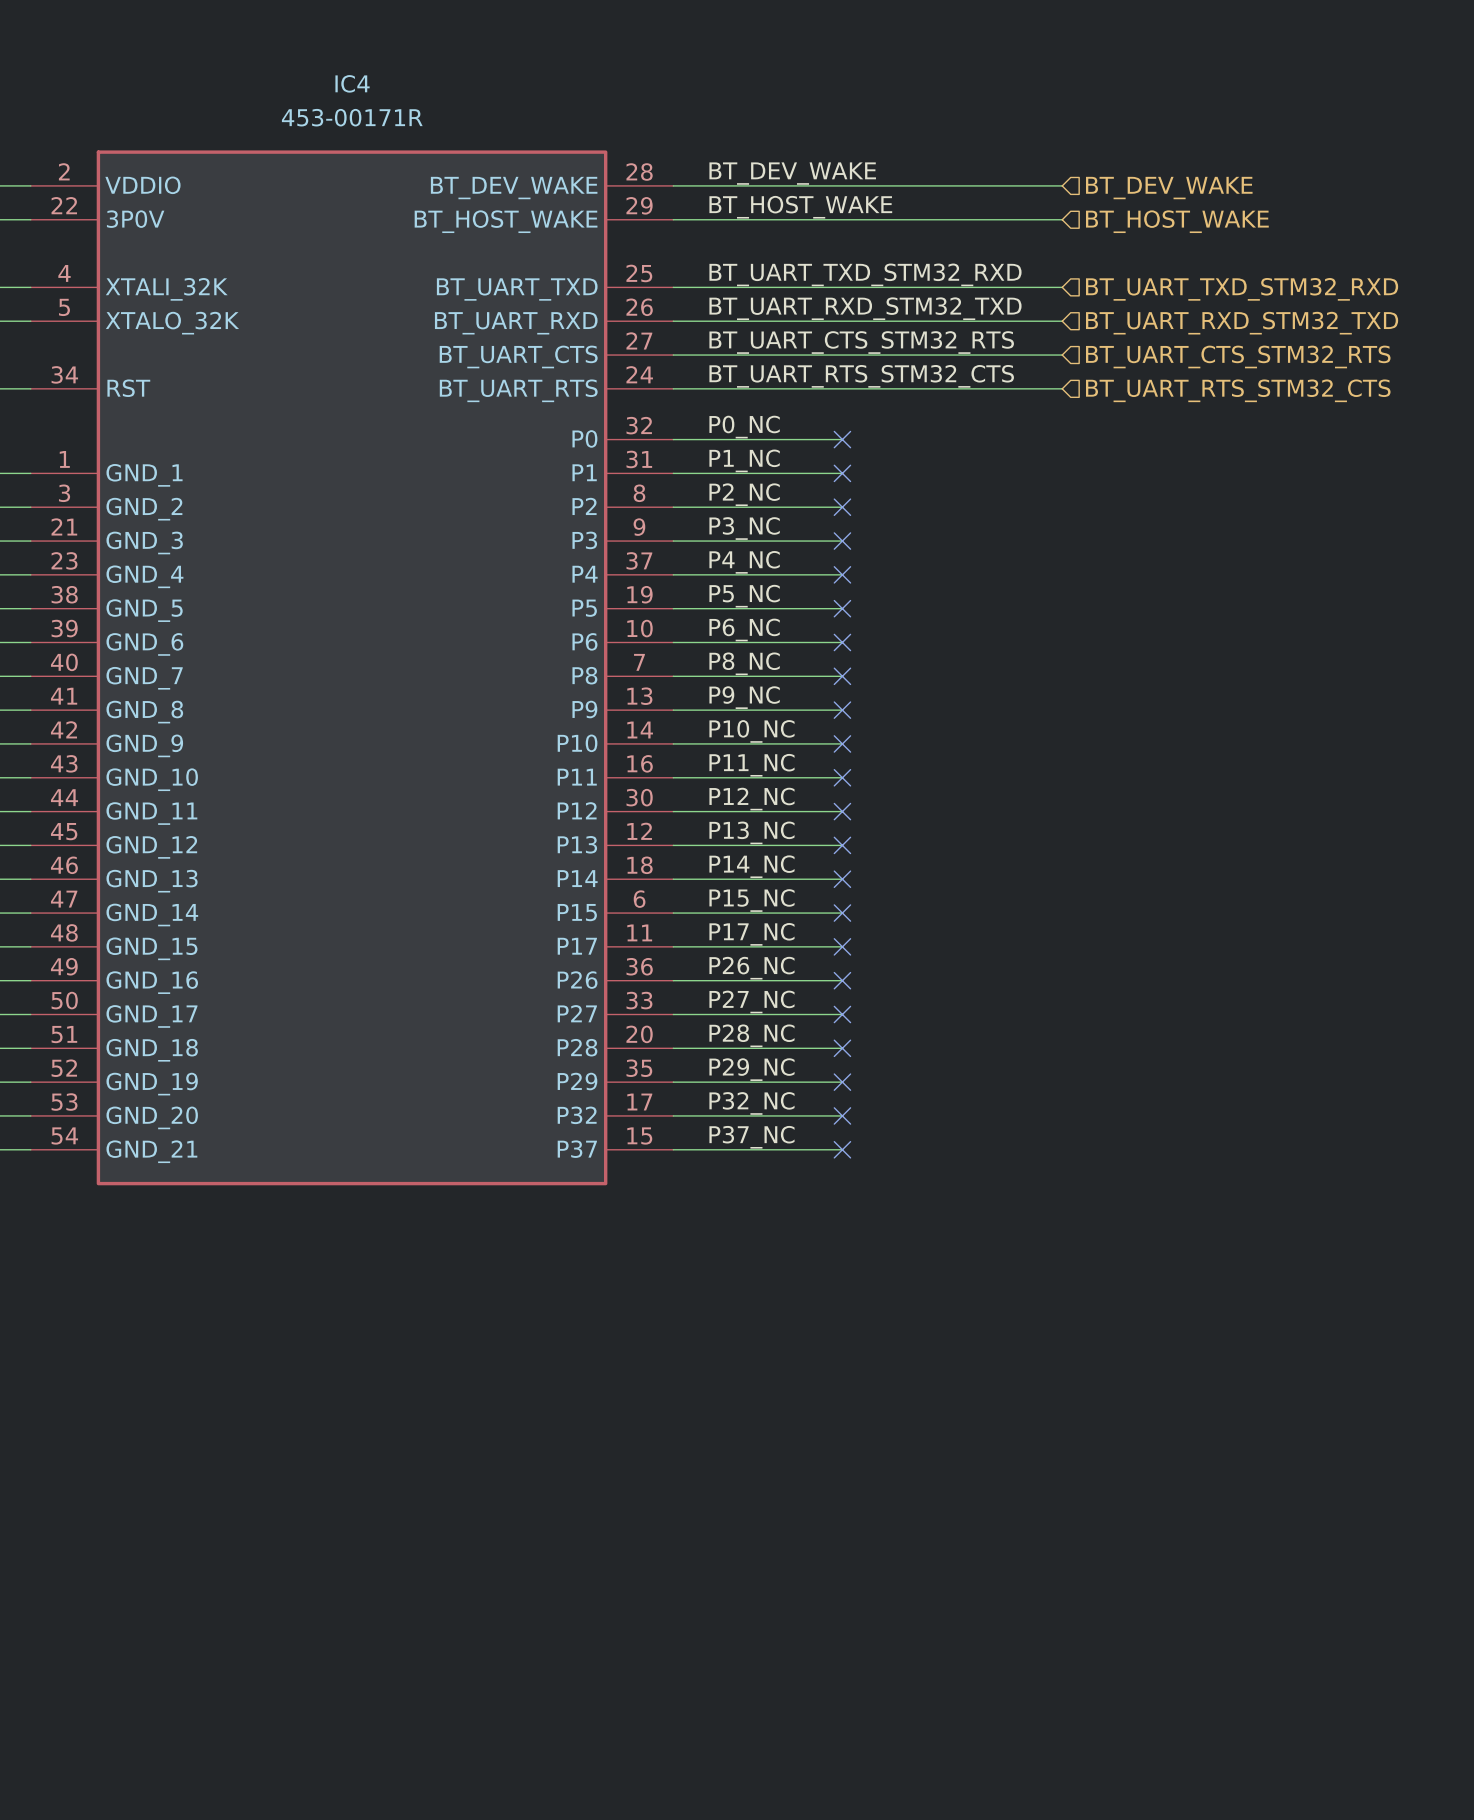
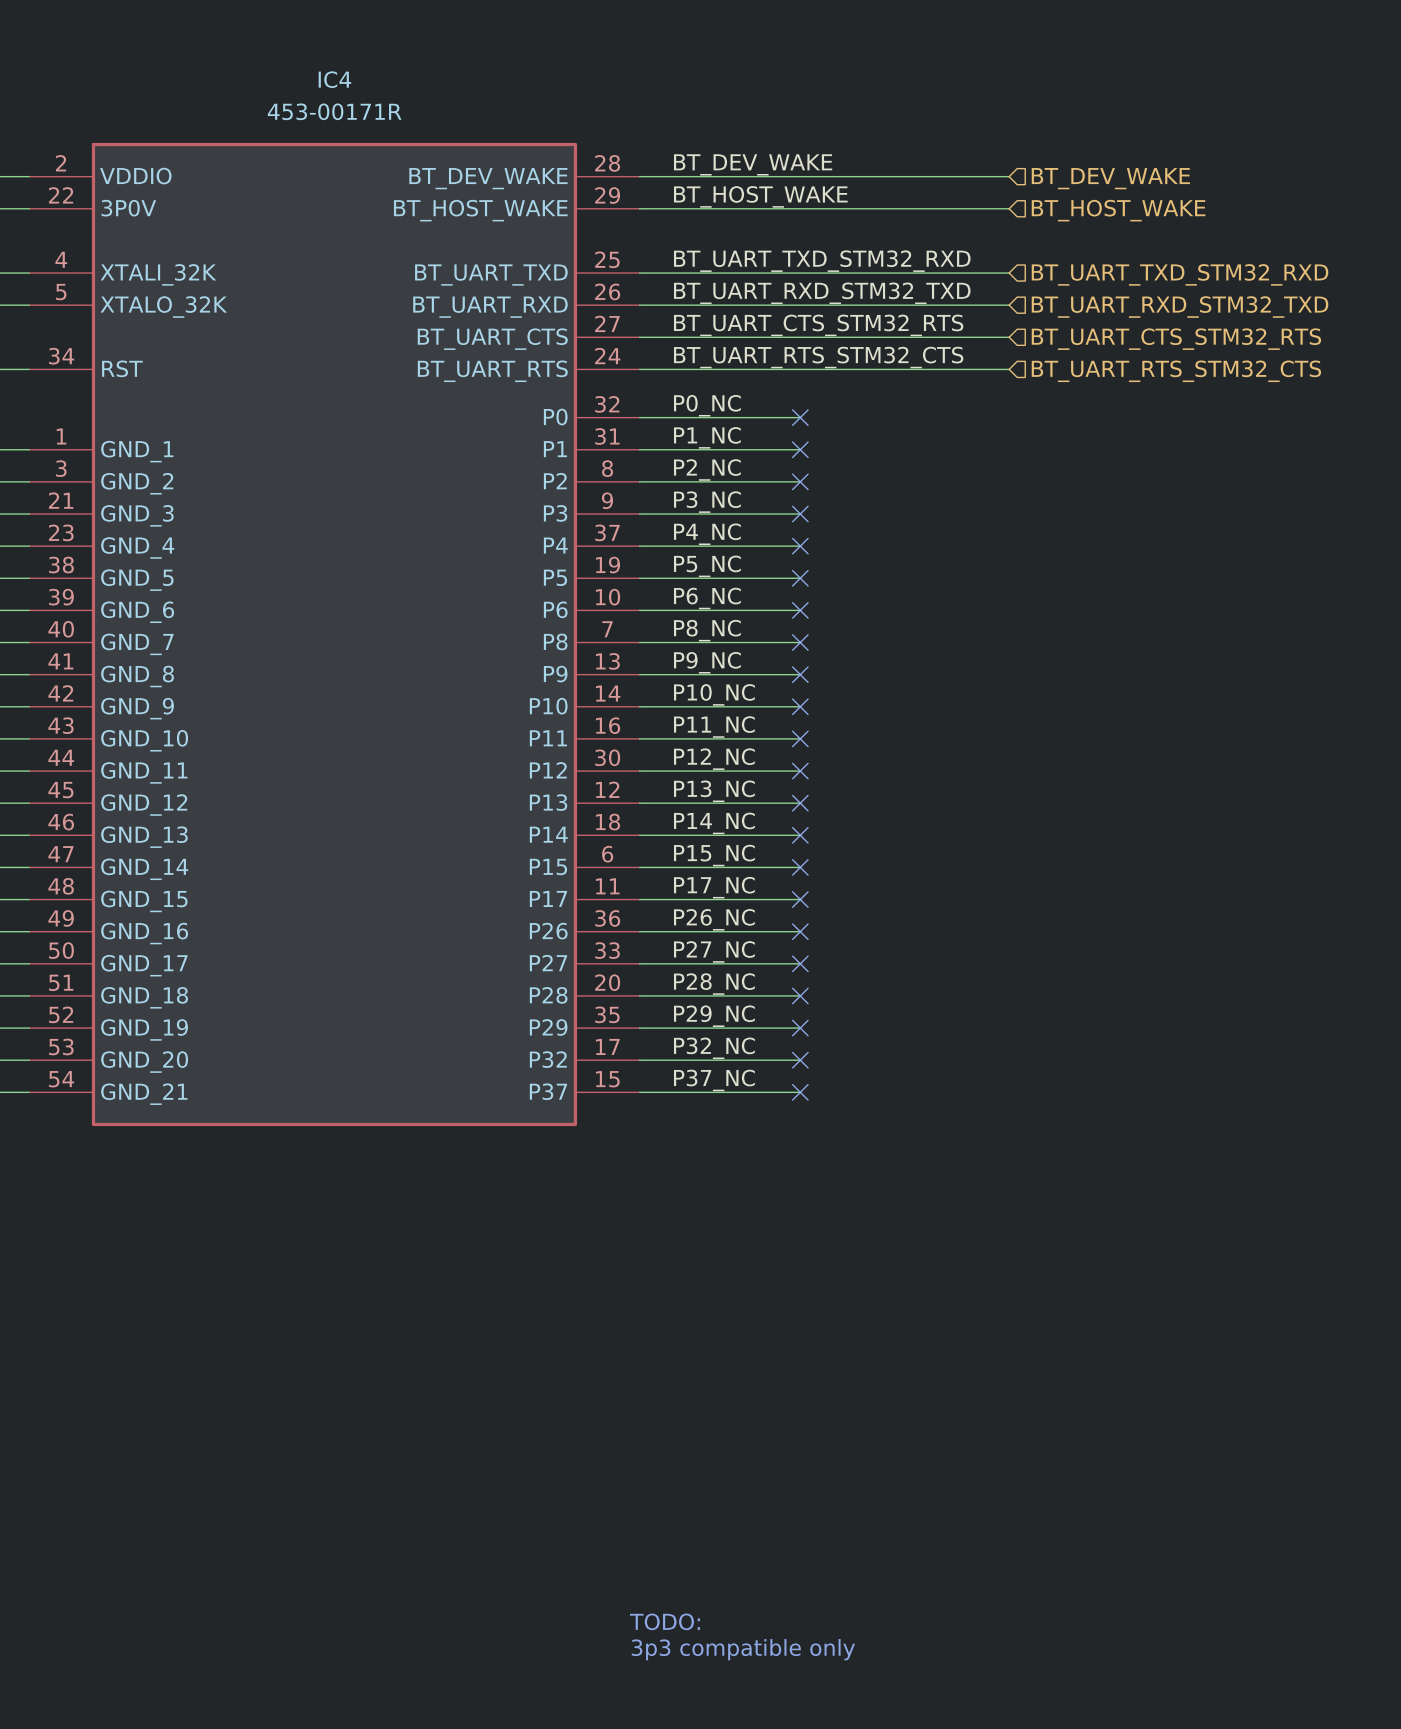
text: none -> TODO: (665, 1621)
text: none -> 3p3 compatible only (743, 1649)

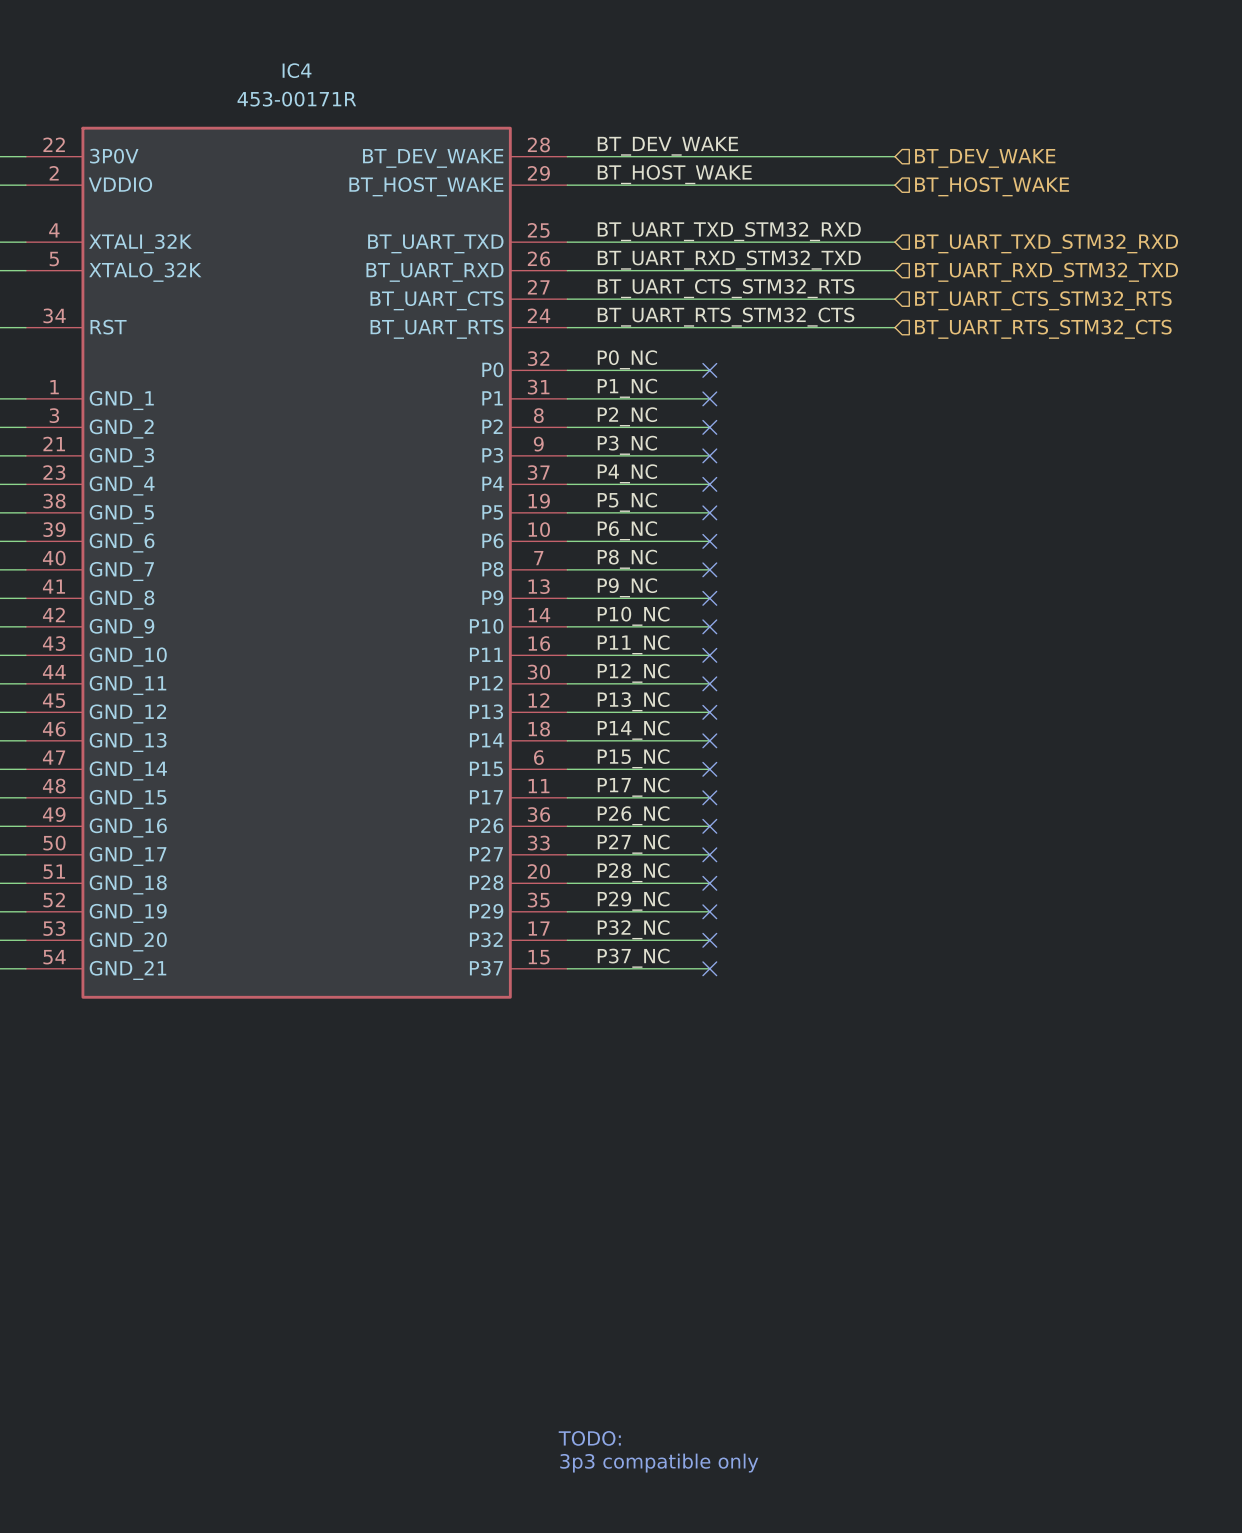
IC4 pin number: 2 (61, 163) -> 22 (54, 144)
IC4 pin name: VDDIO (135, 176) -> 3P0V (114, 156)
IC4 pin number: 22 (61, 195) -> 2 (54, 173)
IC4 pin name: 3P0V (128, 208) -> VDDIO (120, 184)

